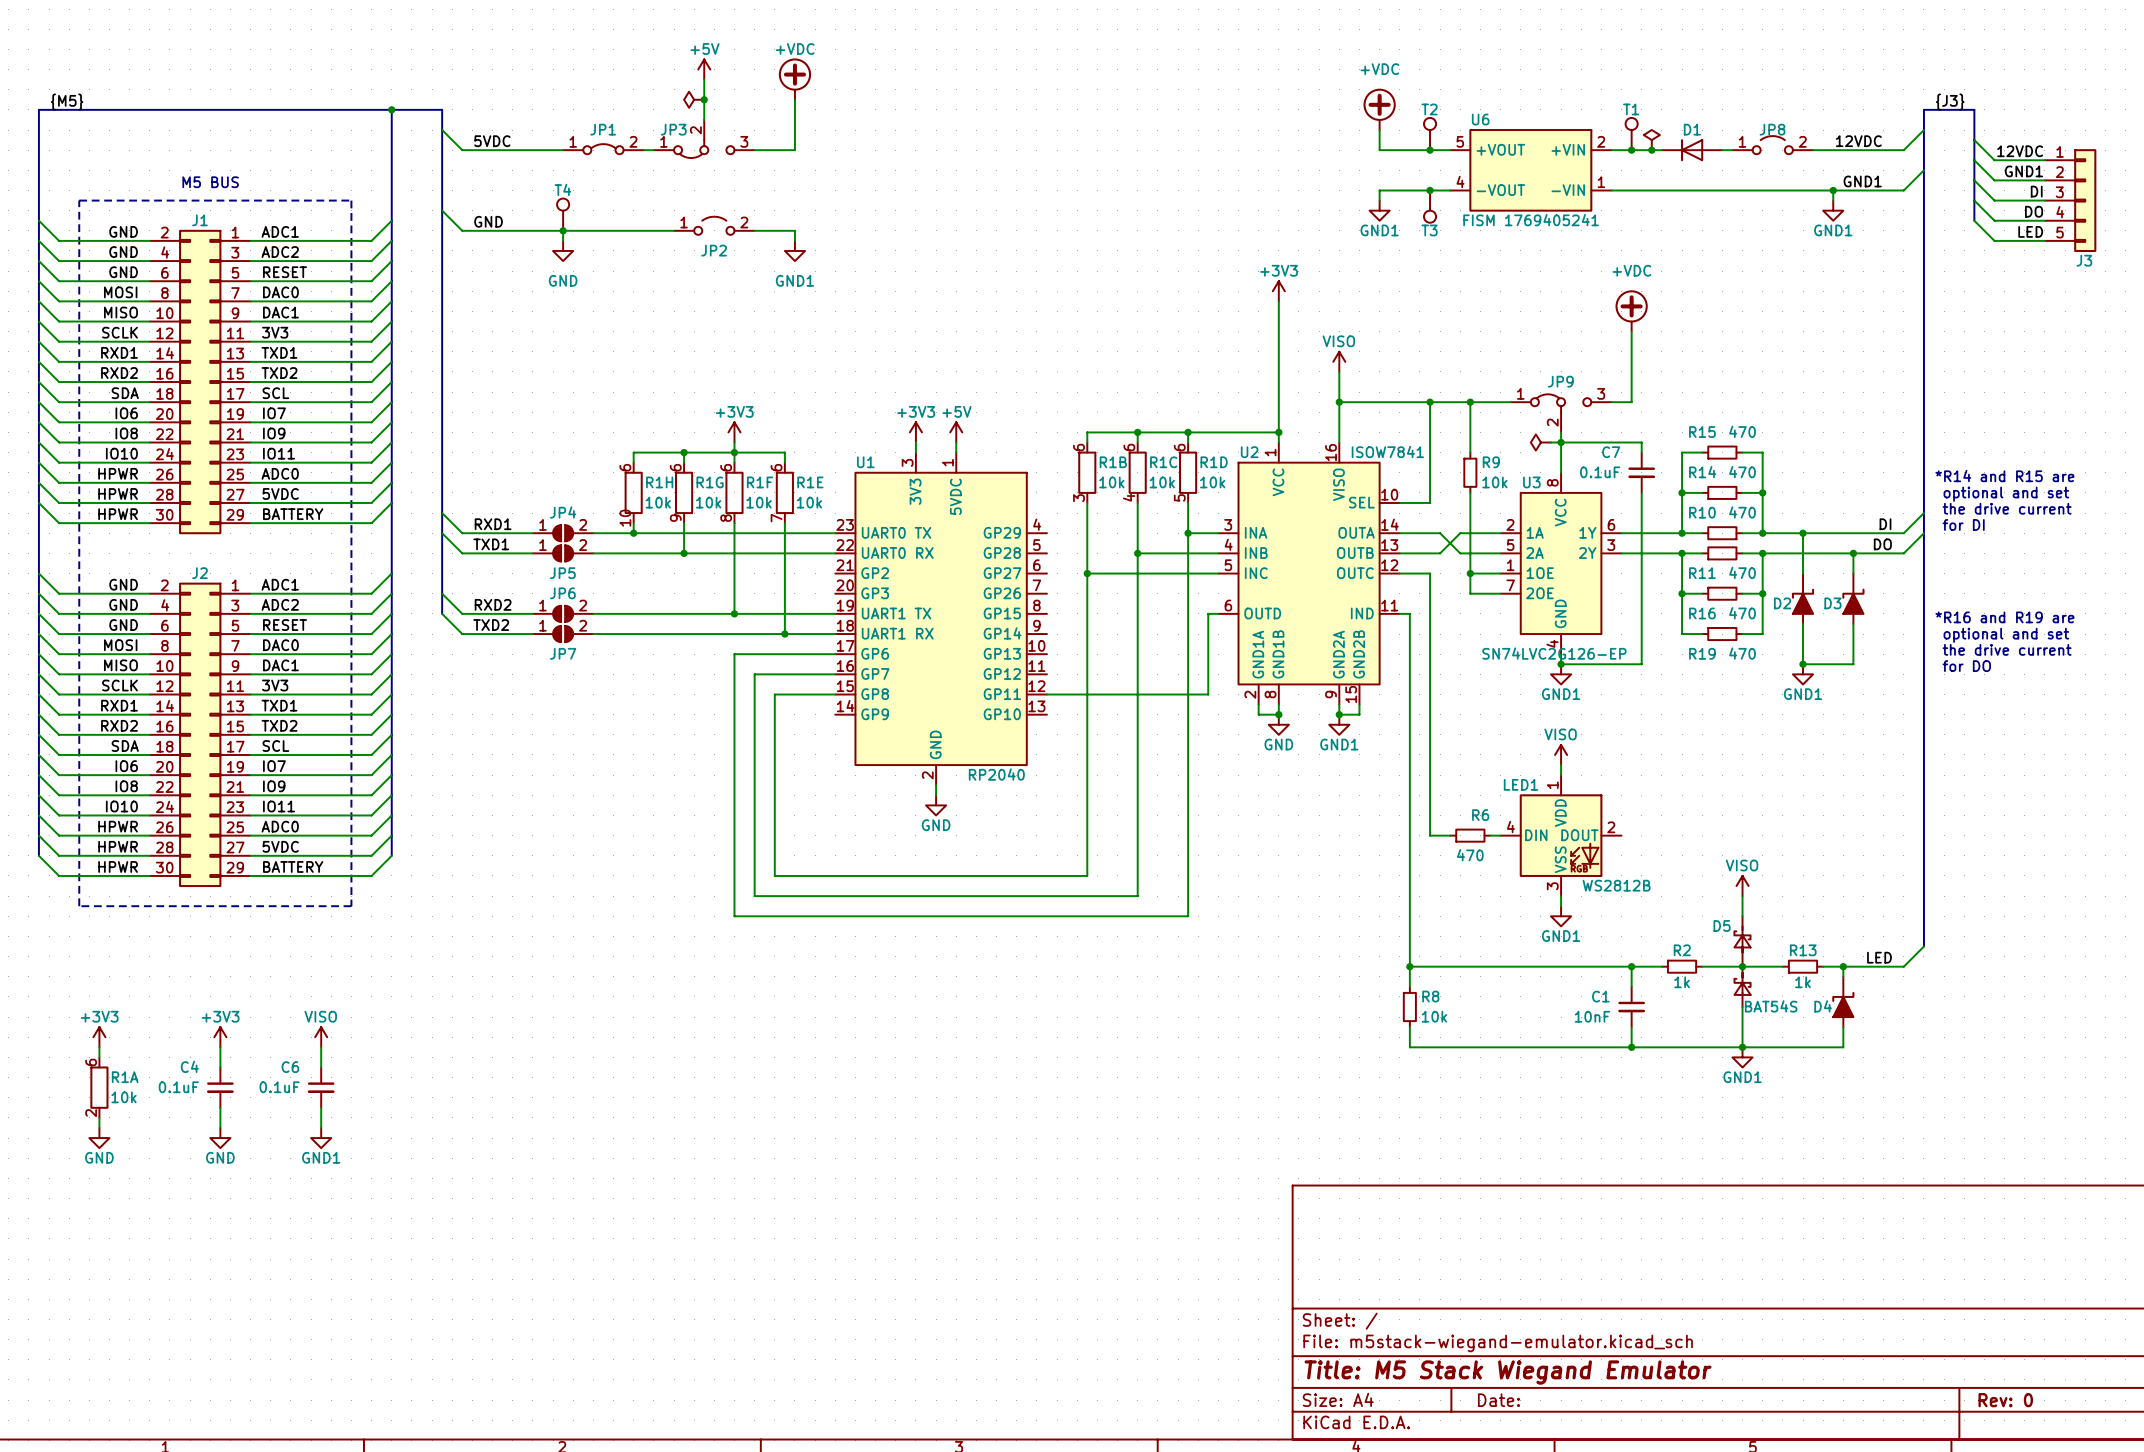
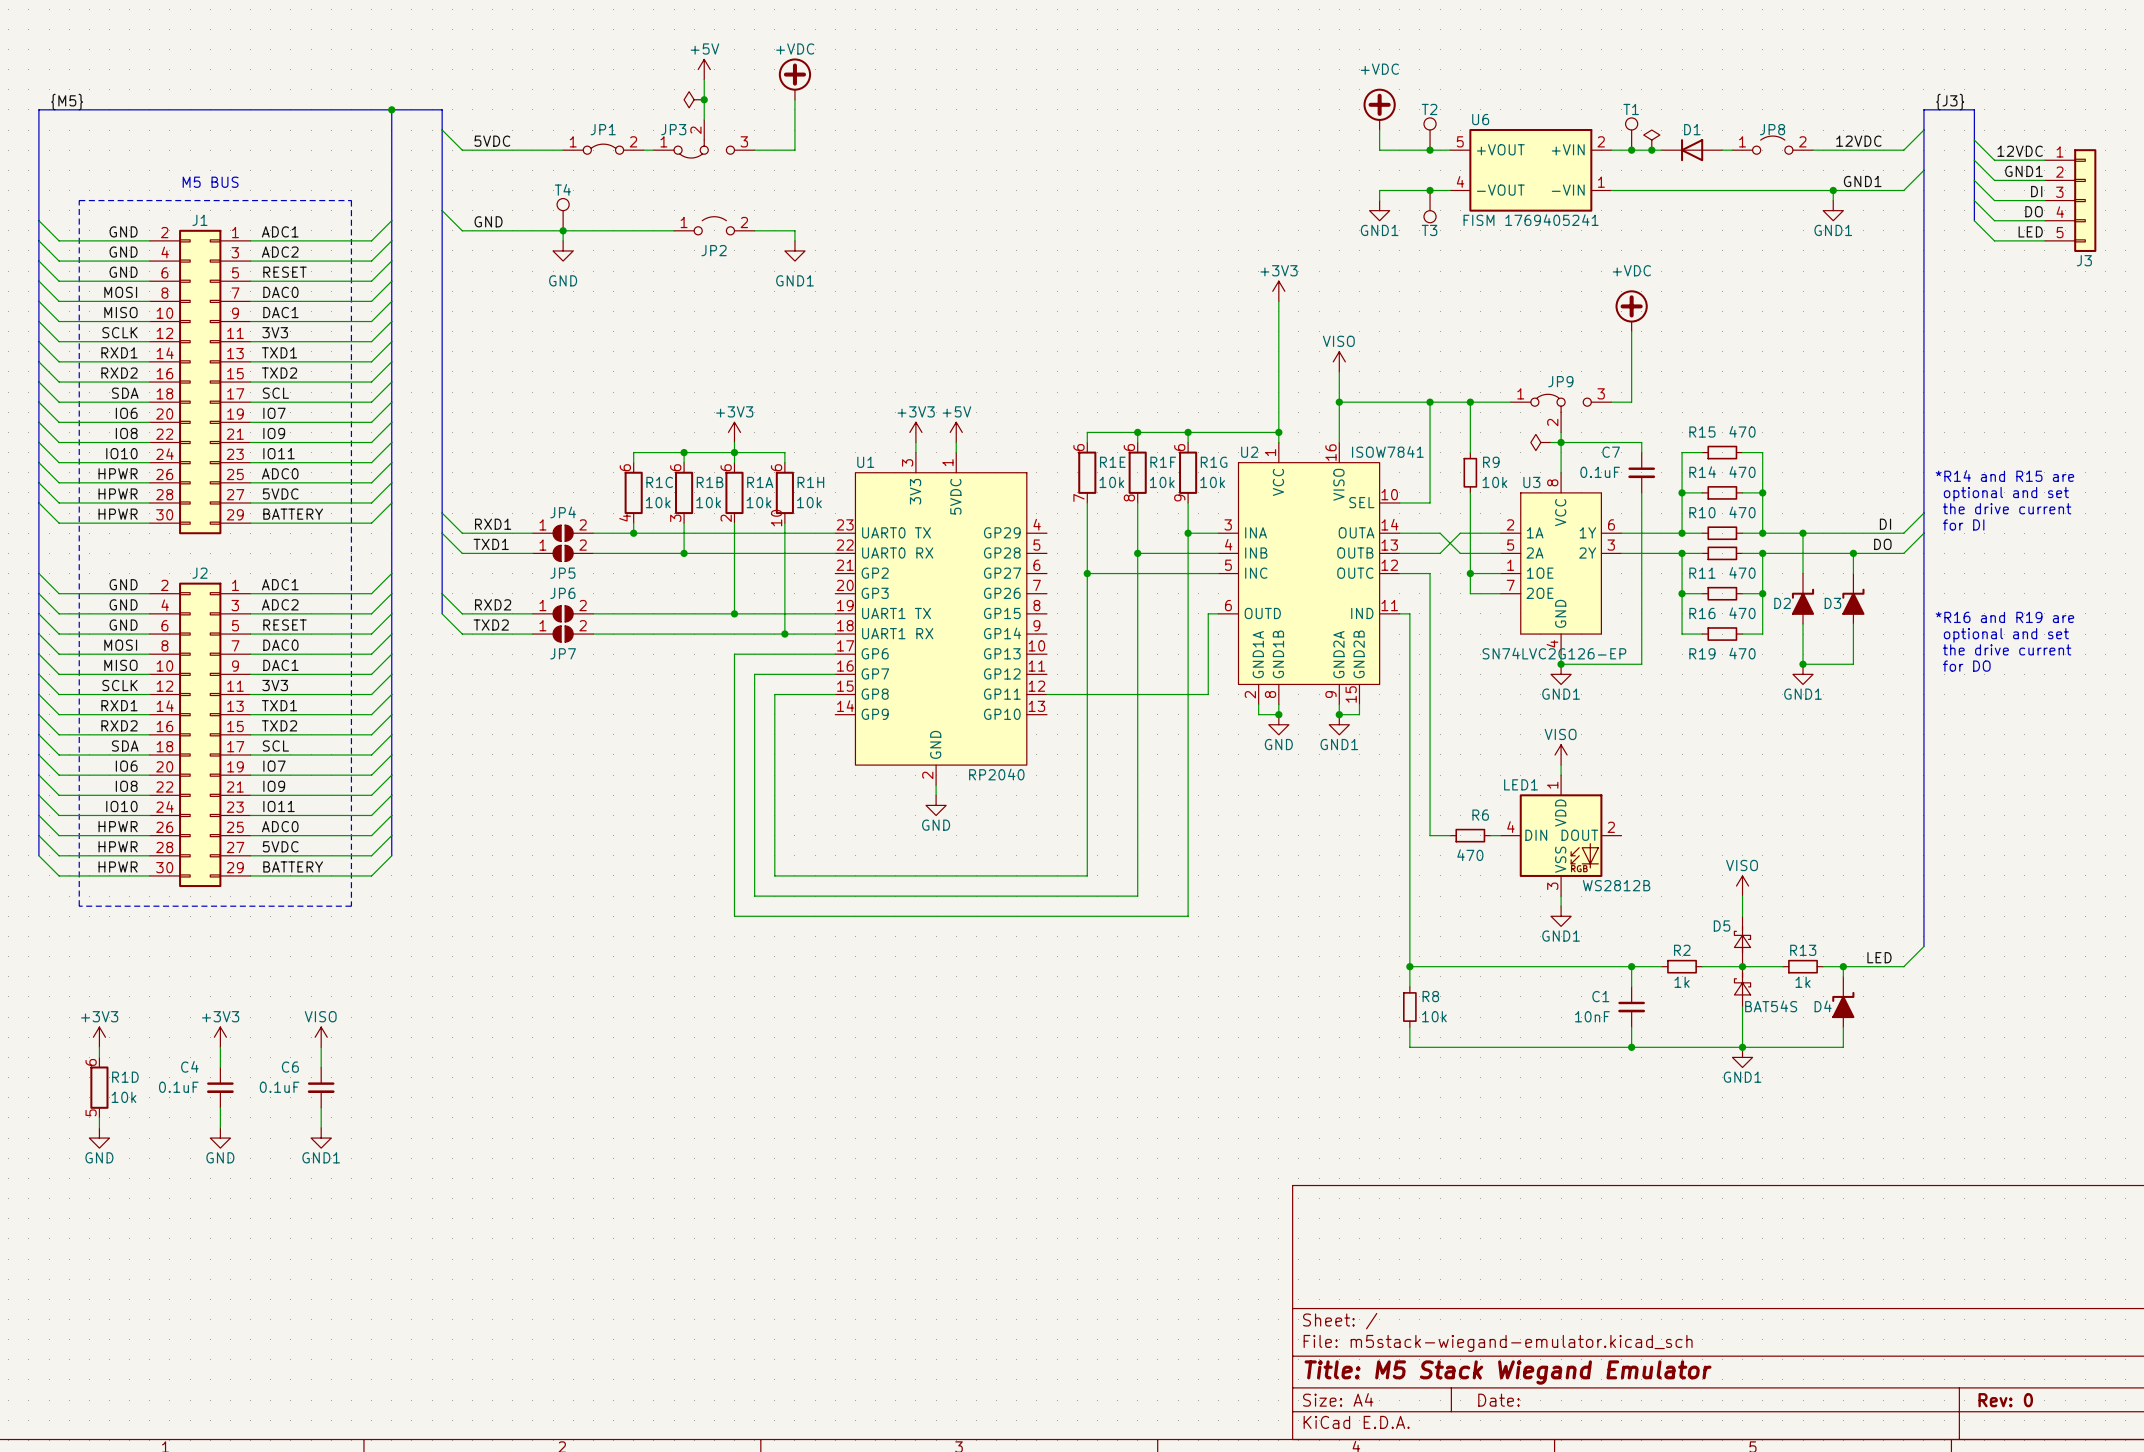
R1B position: (1087, 472) -> (684, 492)
R1C position: (1137, 472) -> (633, 492)
R1D position: (1188, 472) -> (99, 1087)
R1H position: (633, 492) -> (784, 492)
R1G position: (684, 492) -> (1188, 472)
R1F position: (734, 492) -> (1137, 472)
R1E position: (784, 492) -> (1087, 472)
R1A position: (99, 1087) -> (734, 492)

